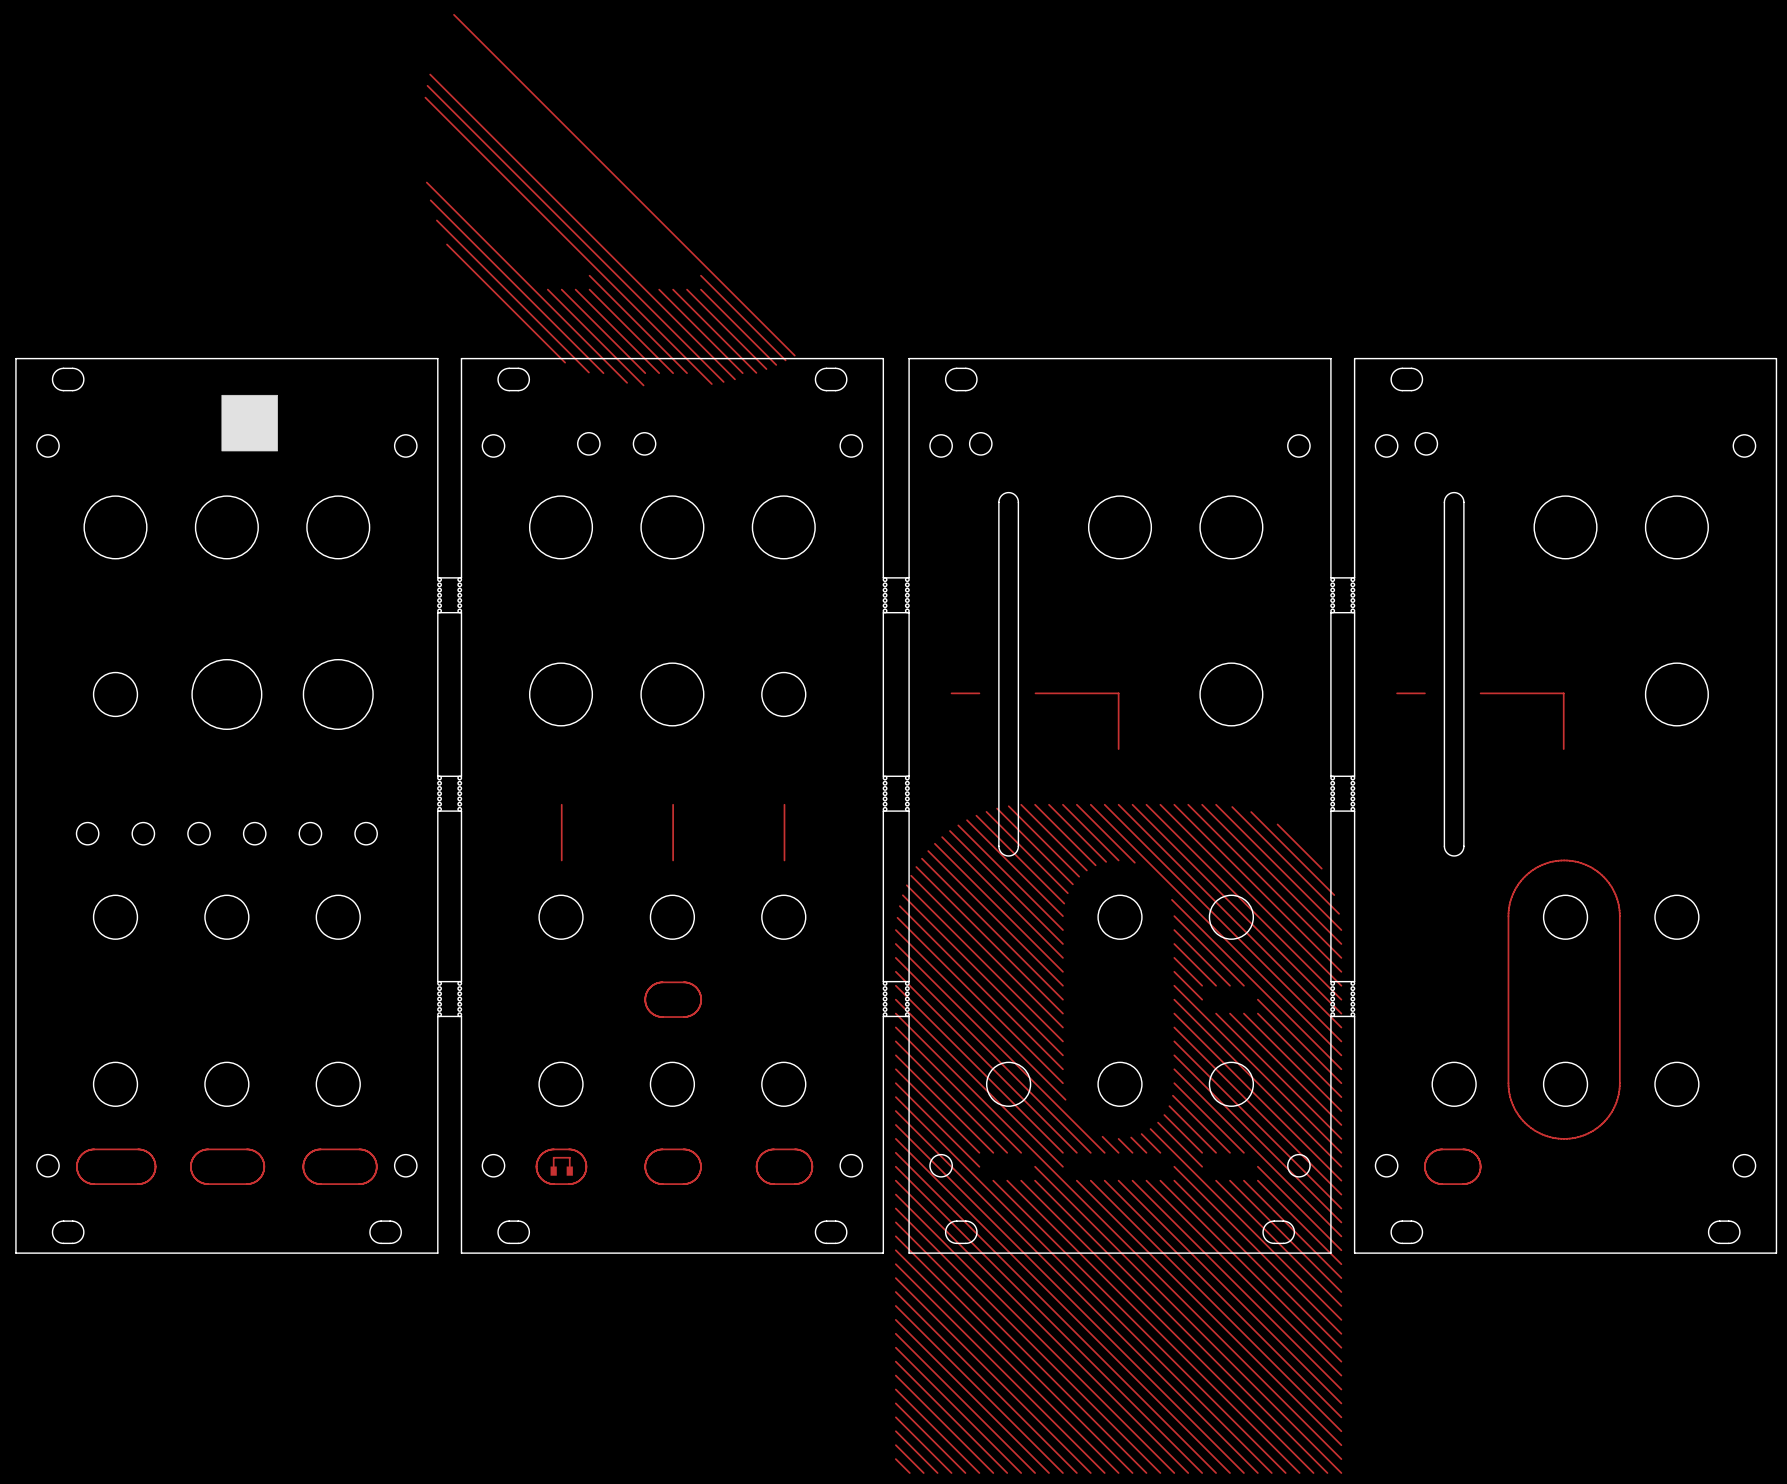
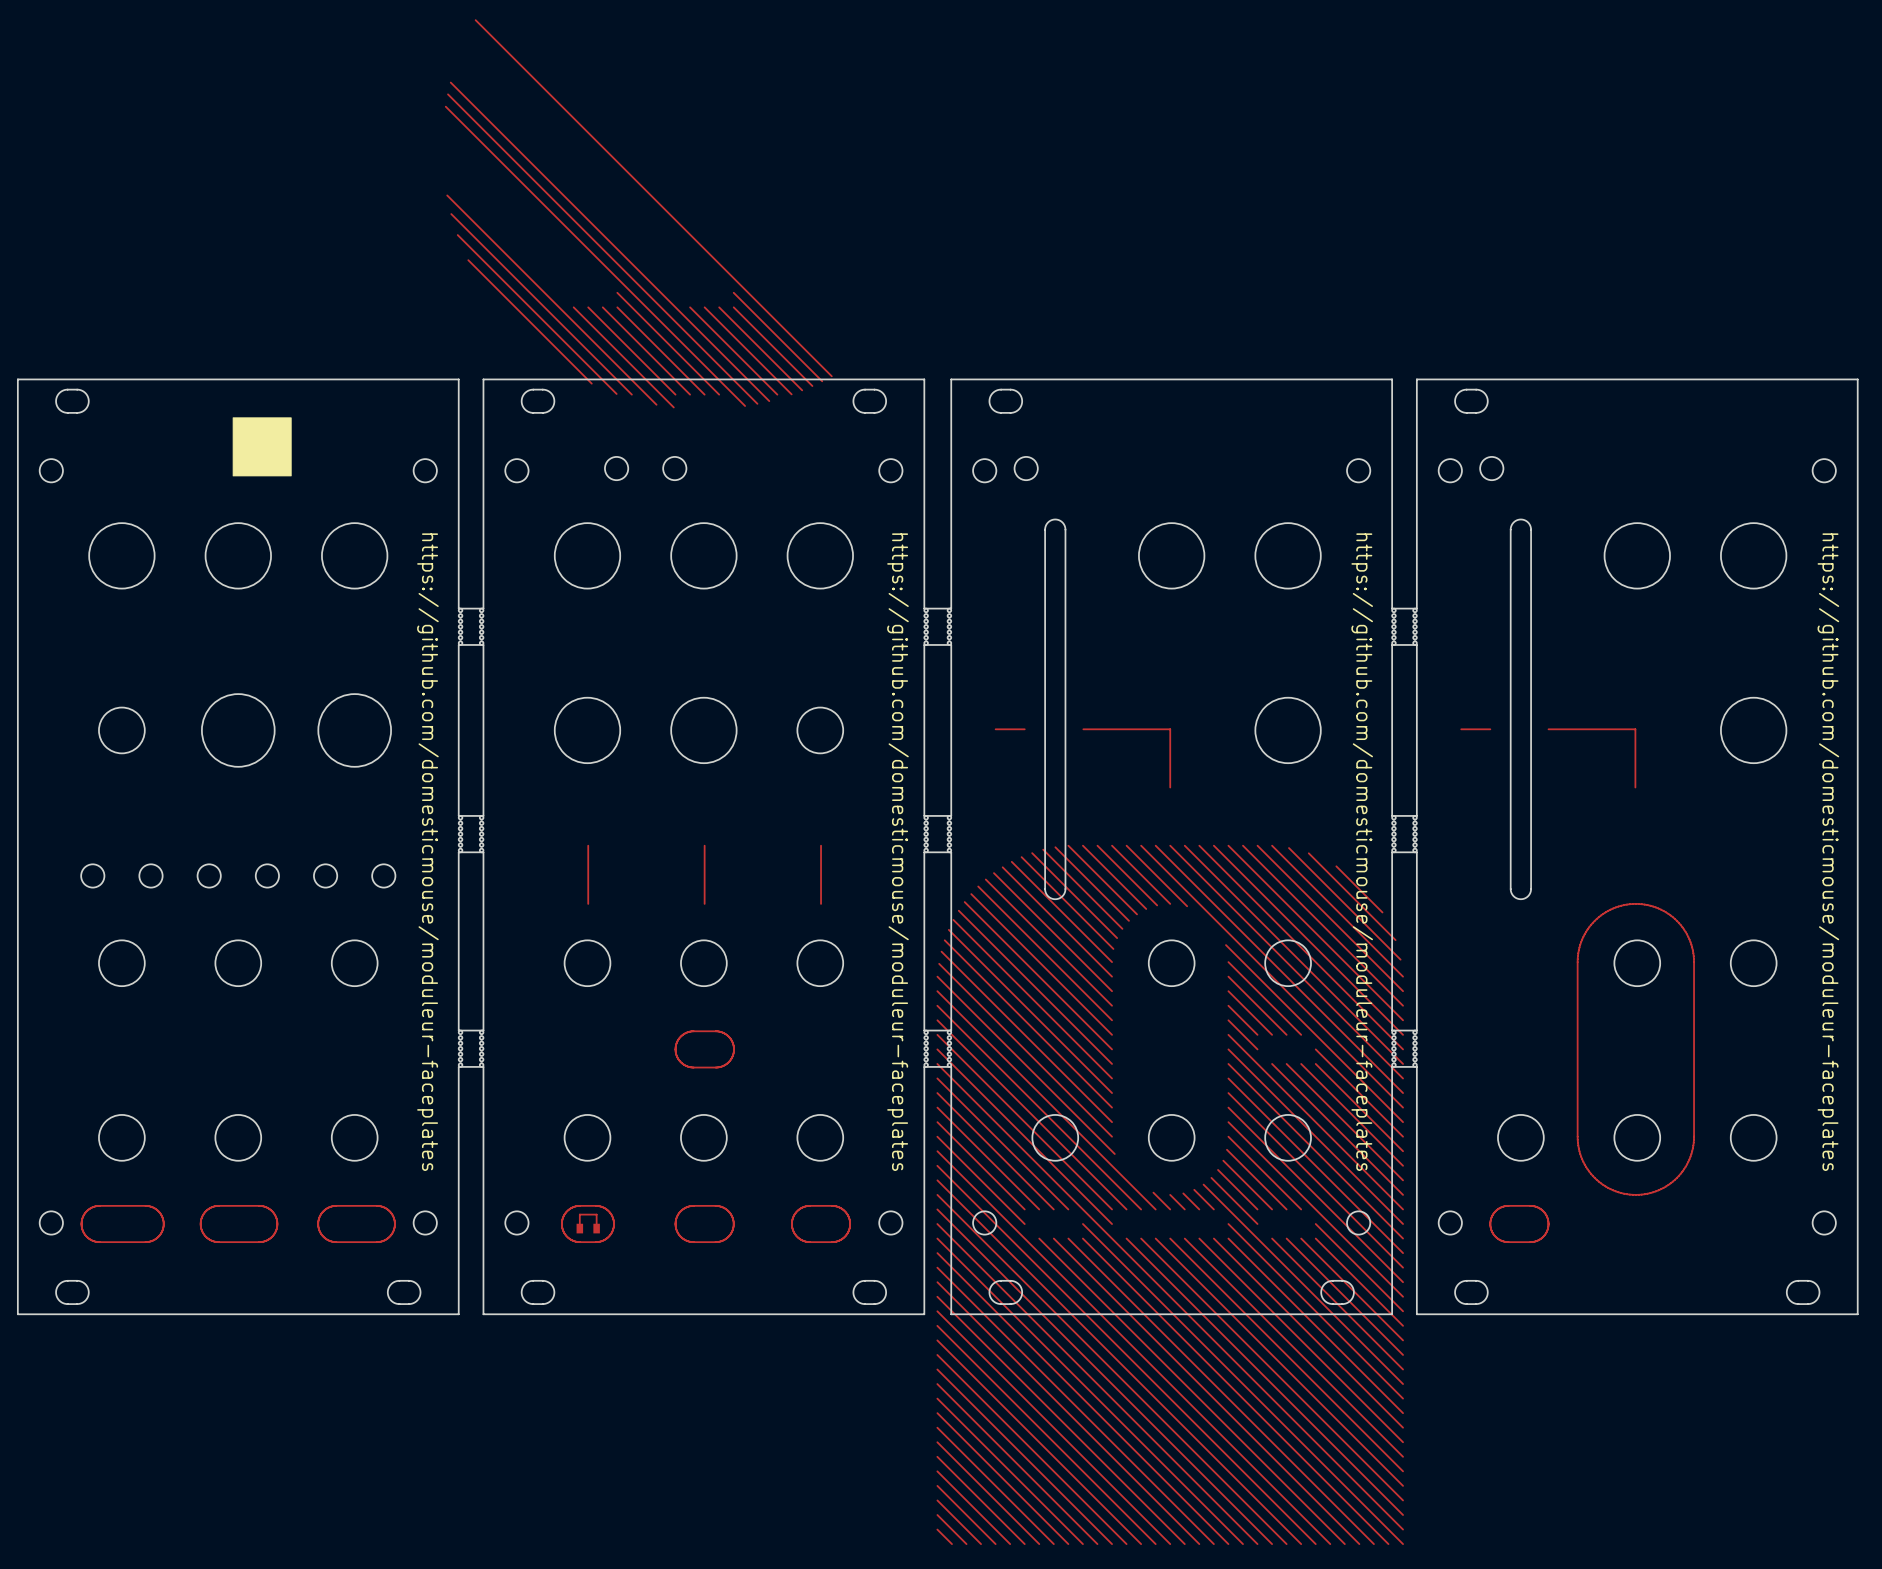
text: none -> https://github.com/domesticmouse/moduleur-faceplates (427, 852)
text: none -> https://github.com/domesticmouse/moduleur-faceplates (897, 852)
text: none -> https://github.com/domesticmouse/moduleur-faceplates (1362, 852)
text: none -> https://github.com/domesticmouse/moduleur-faceplates (1828, 852)

